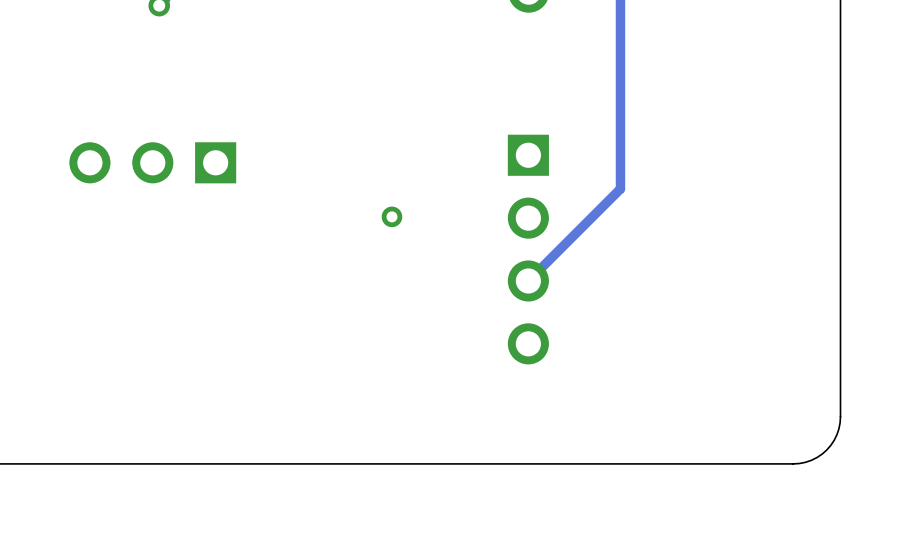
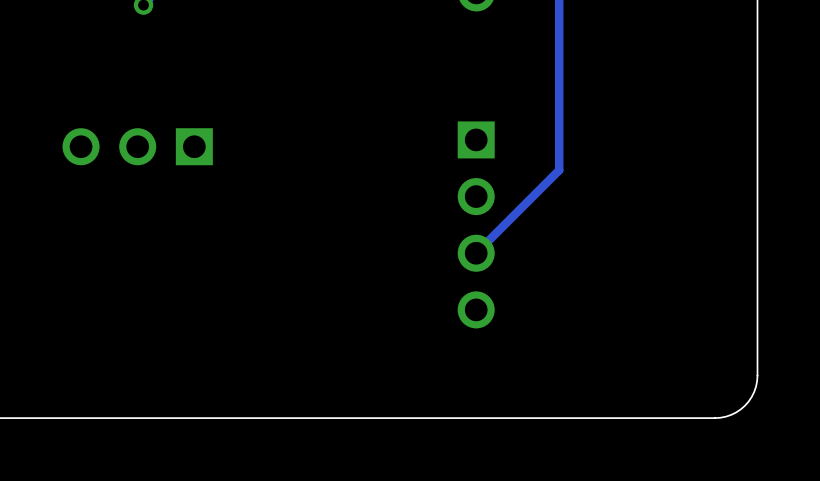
via: (391, 216) -> none

